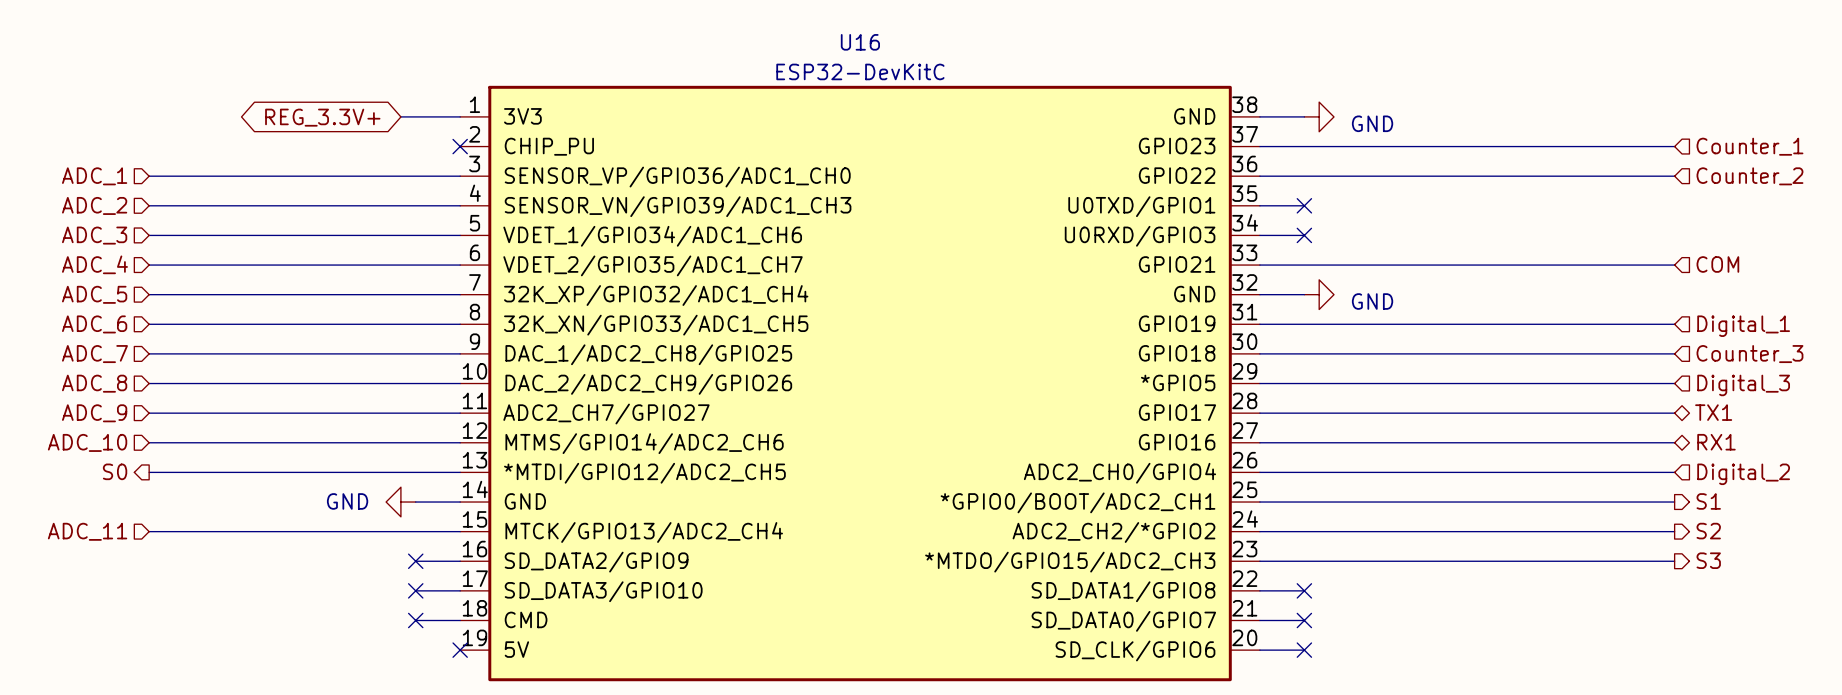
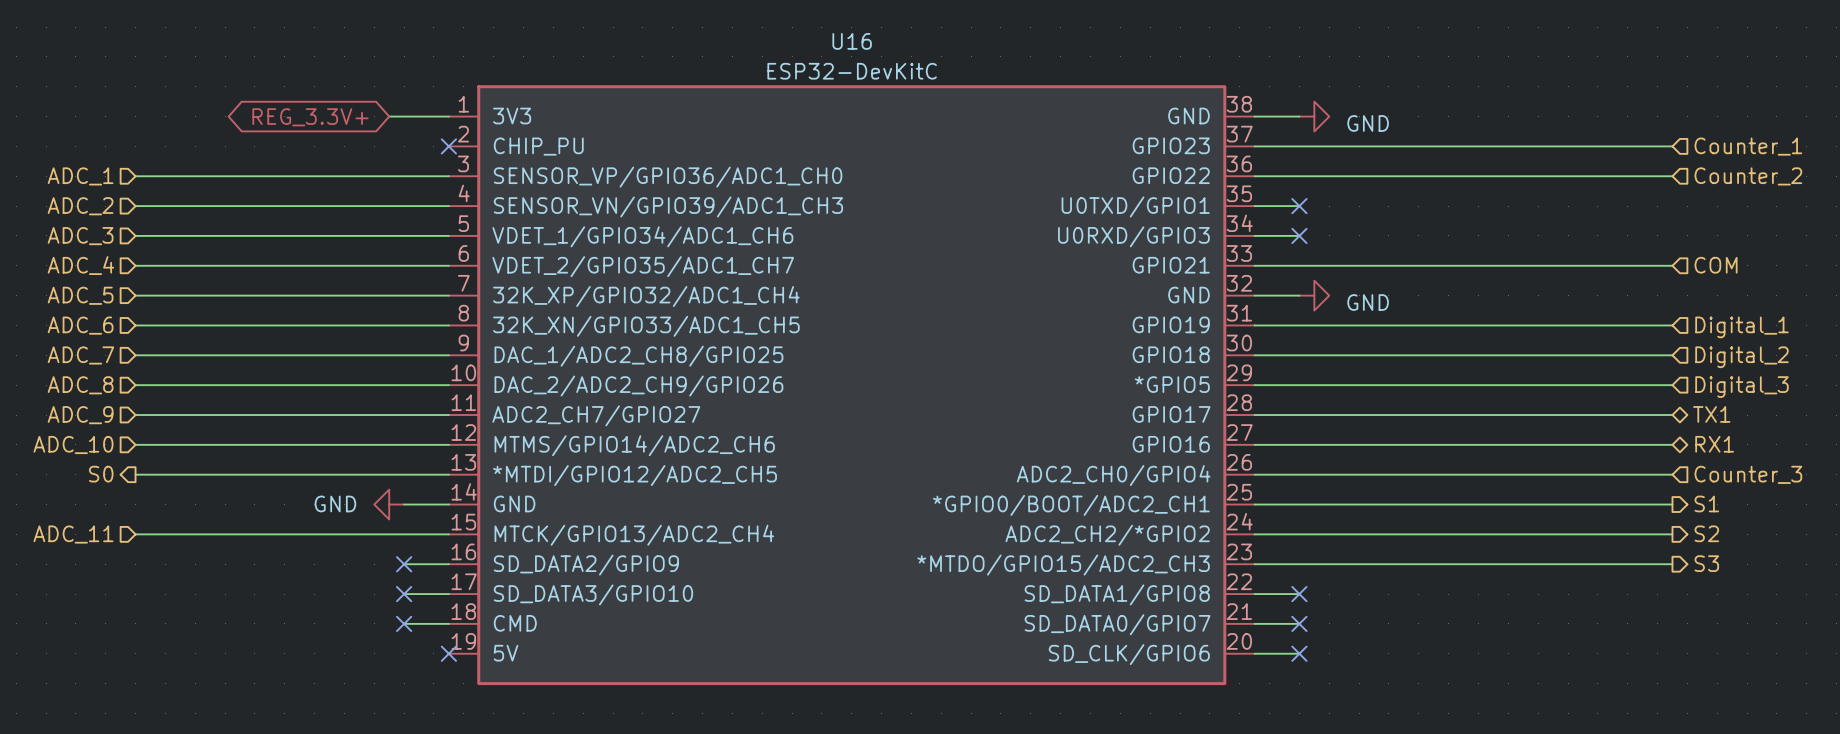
hierarchical label: Counter_3 (1749, 354) -> Digital_2 (1741, 357)
hierarchical label: Digital_2 (1743, 474) -> Counter_3 (1748, 474)

